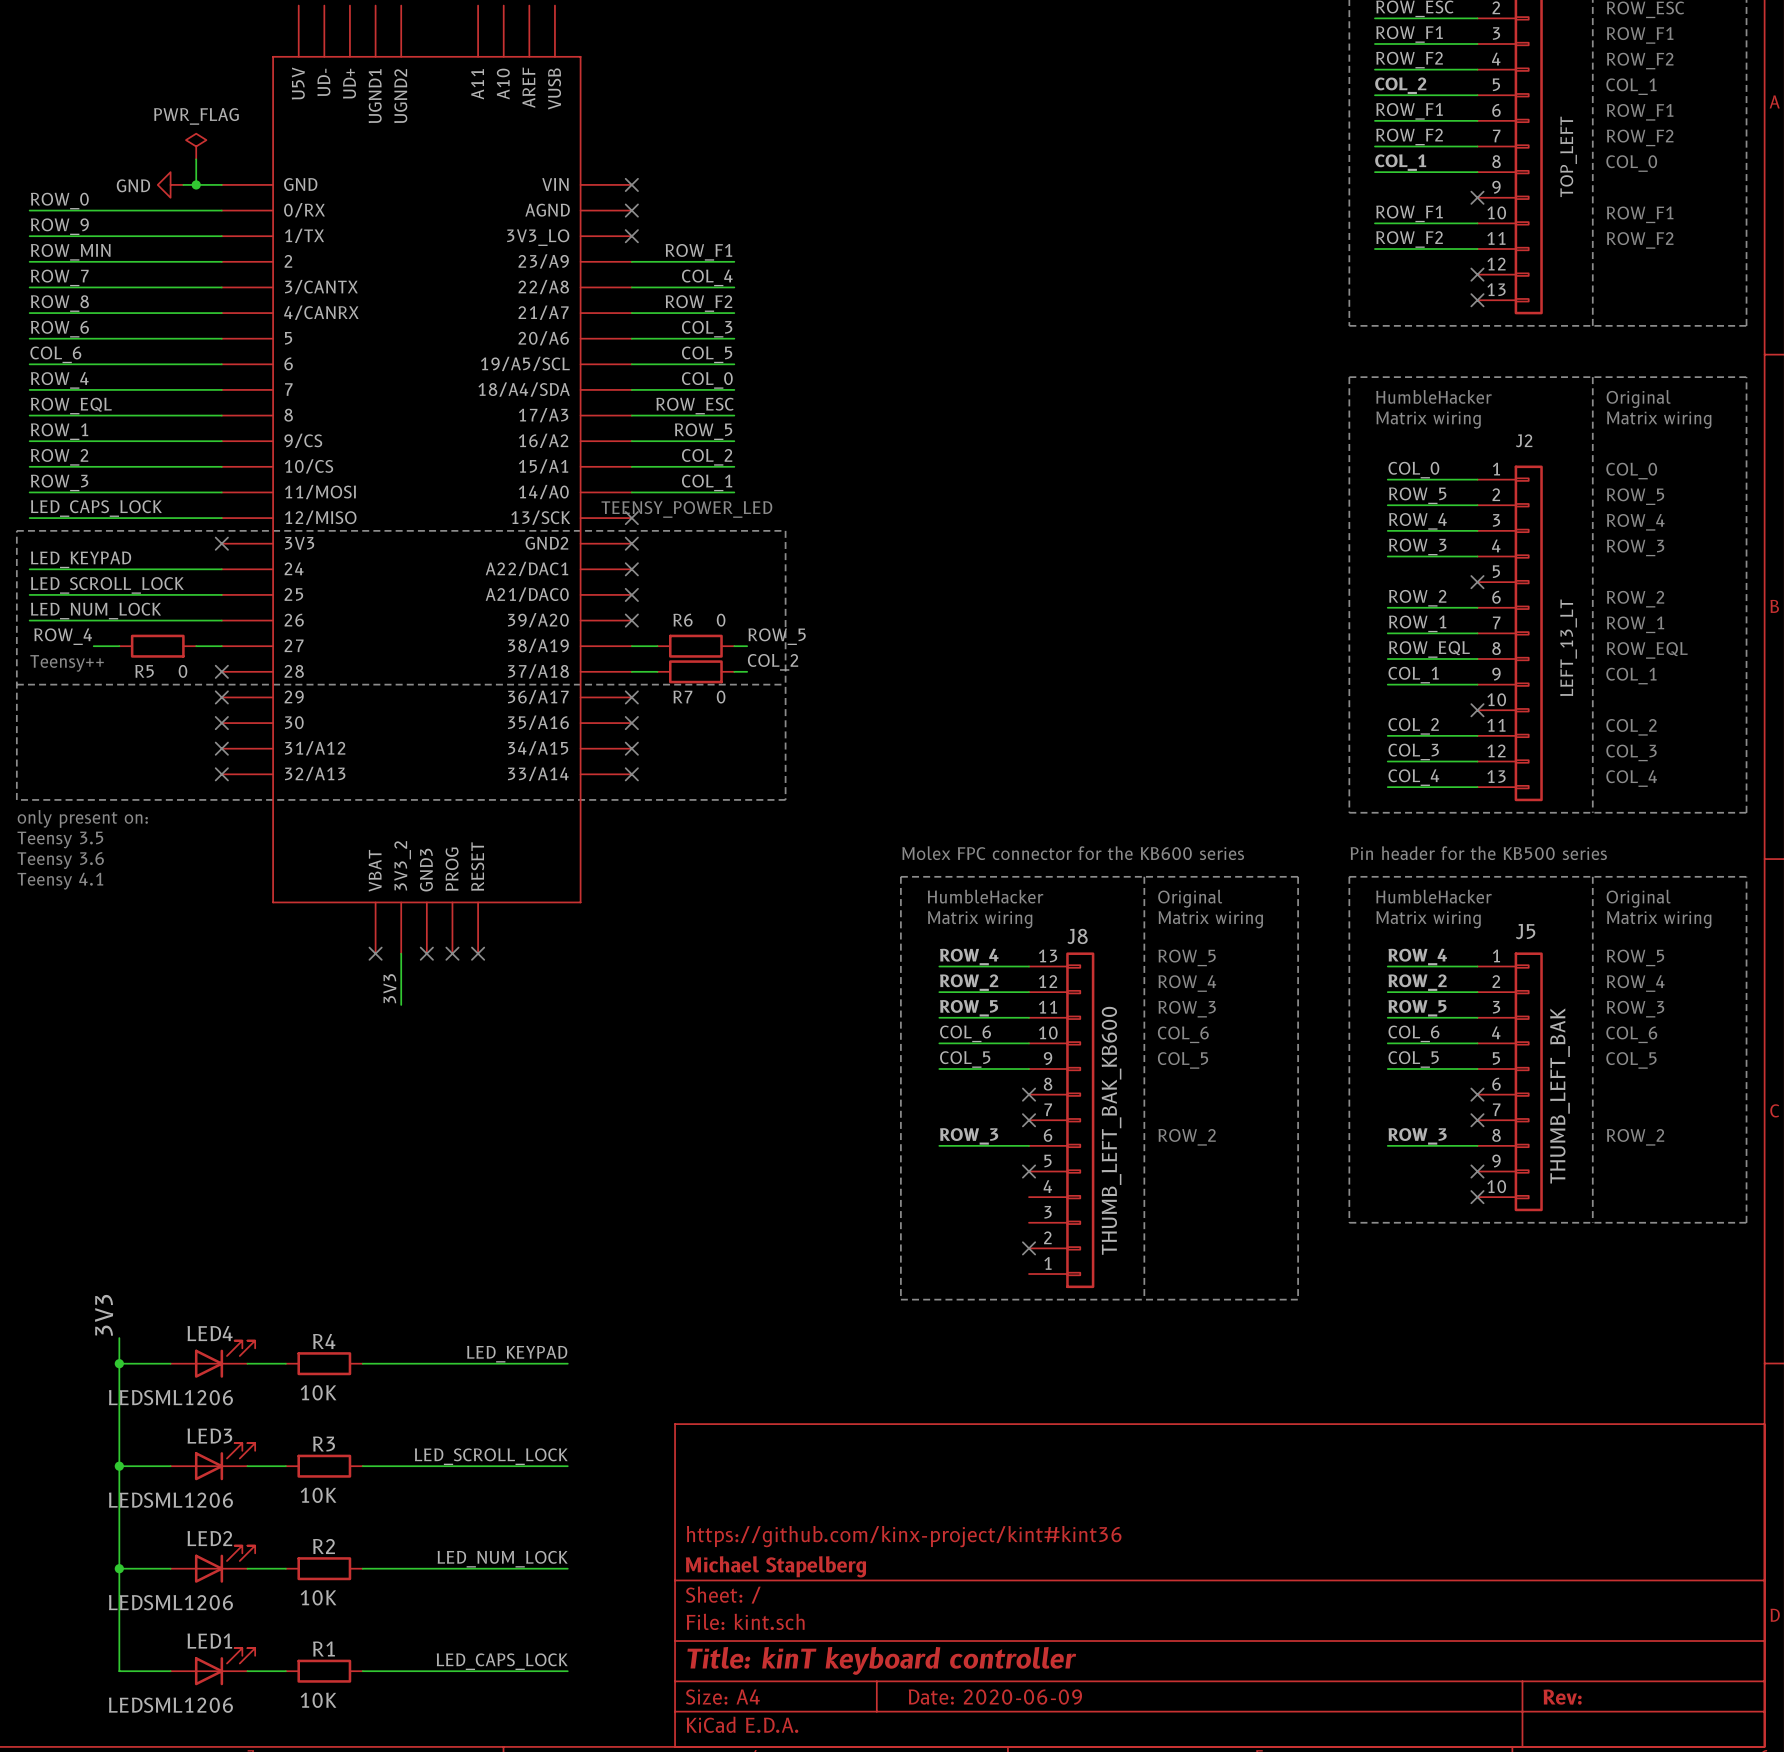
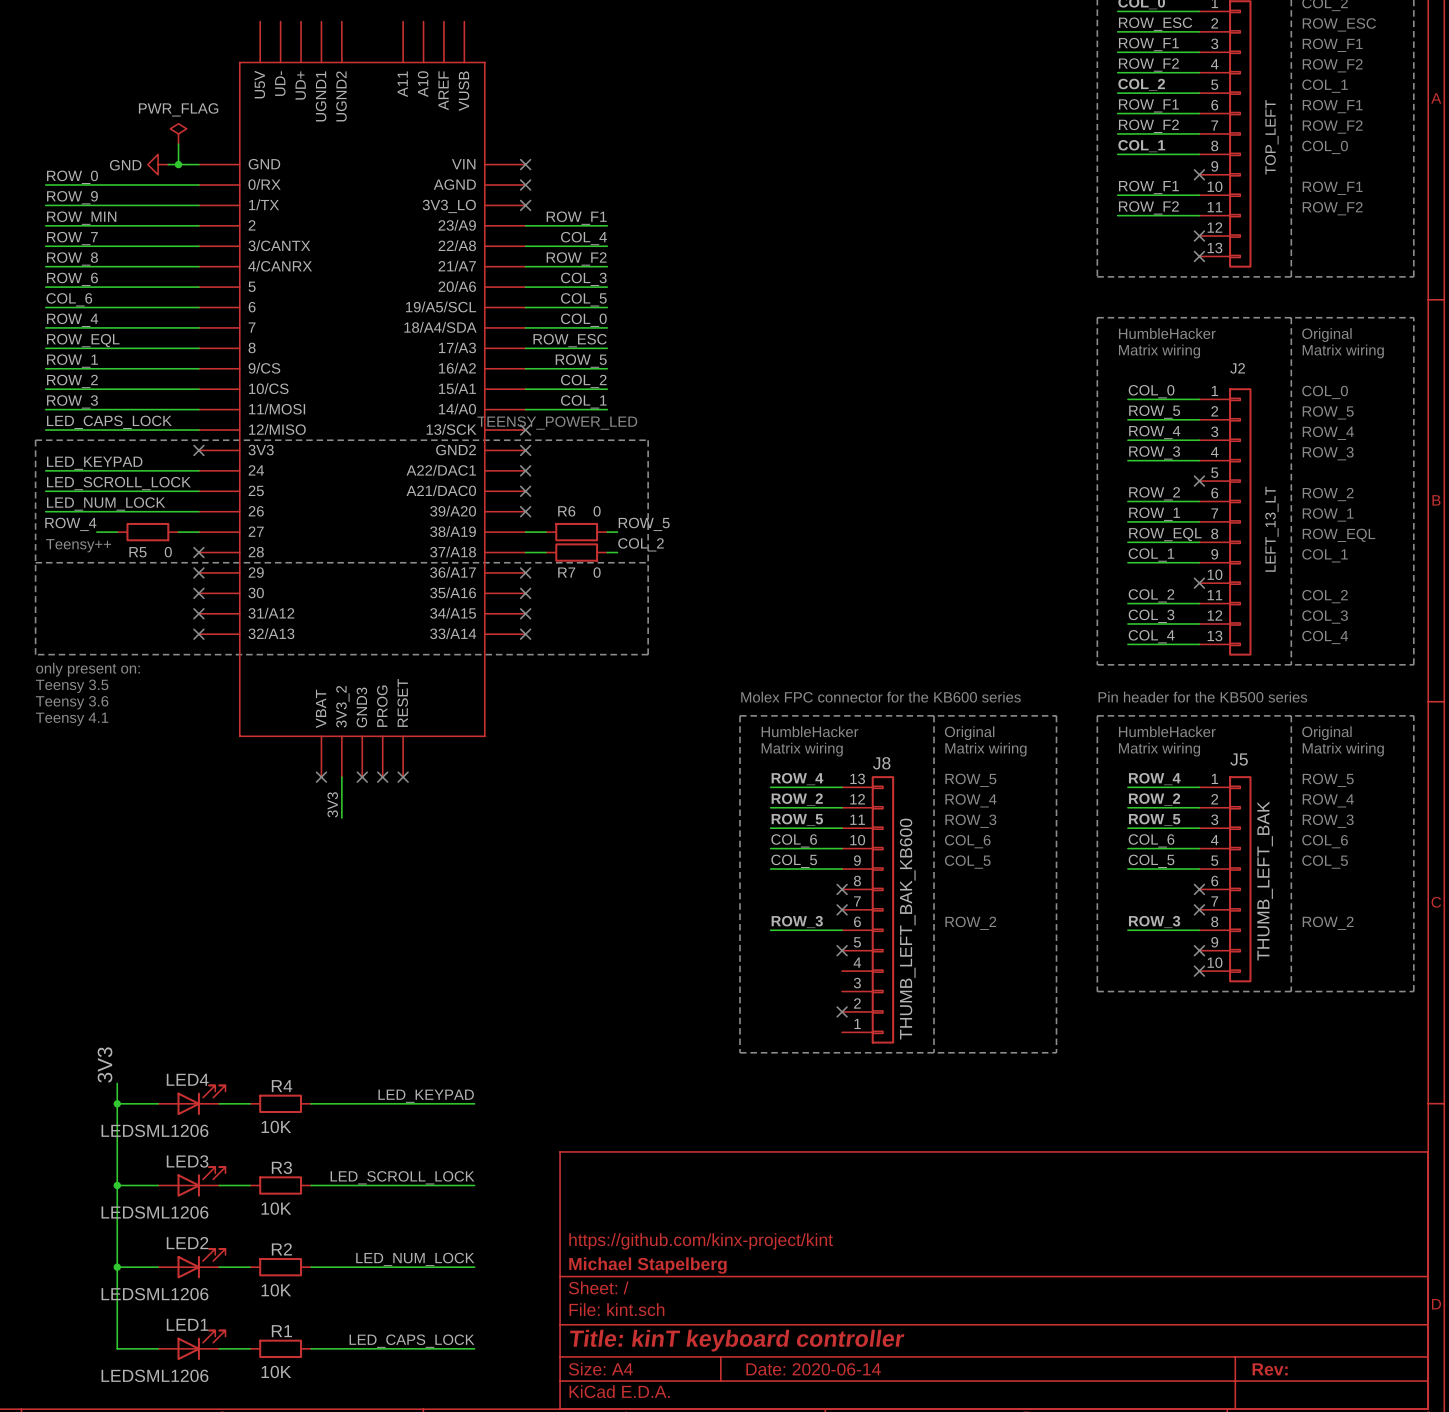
title block: https://github.com/kinx-project/kint#kint36 (904, 1536) -> https://github.com/kinx-project/kint (701, 1241)
title block: Date: 2020-06-09 (995, 1697) -> Date: 2020-06-14 (813, 1369)

